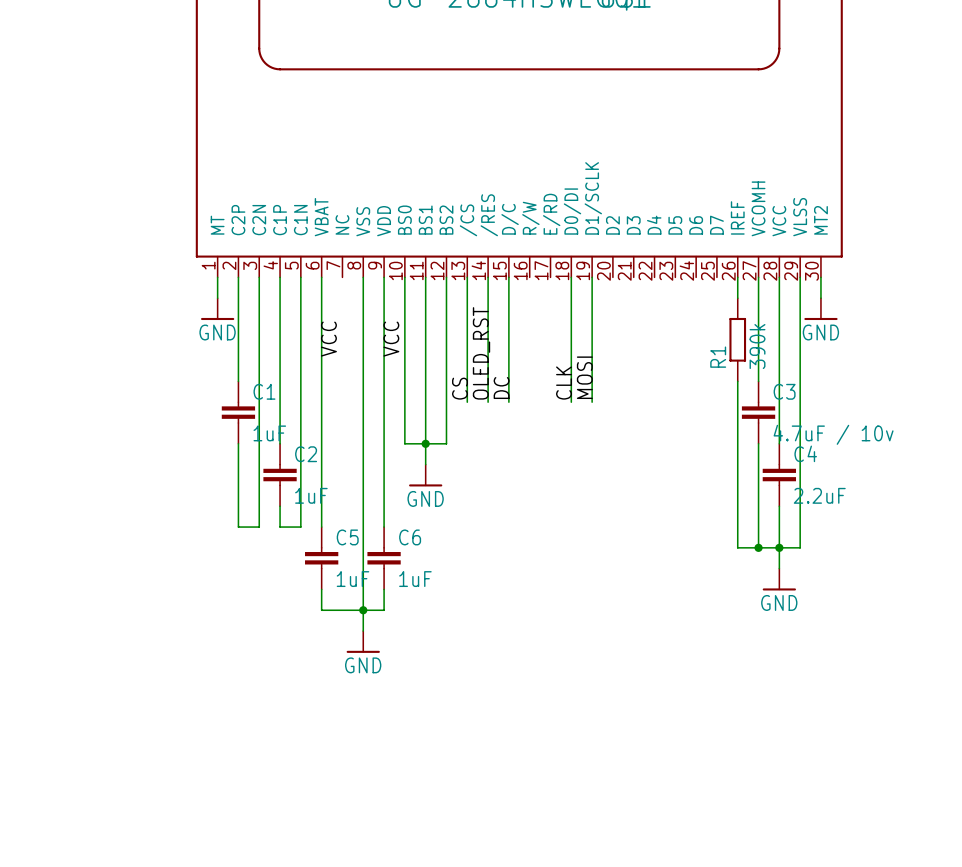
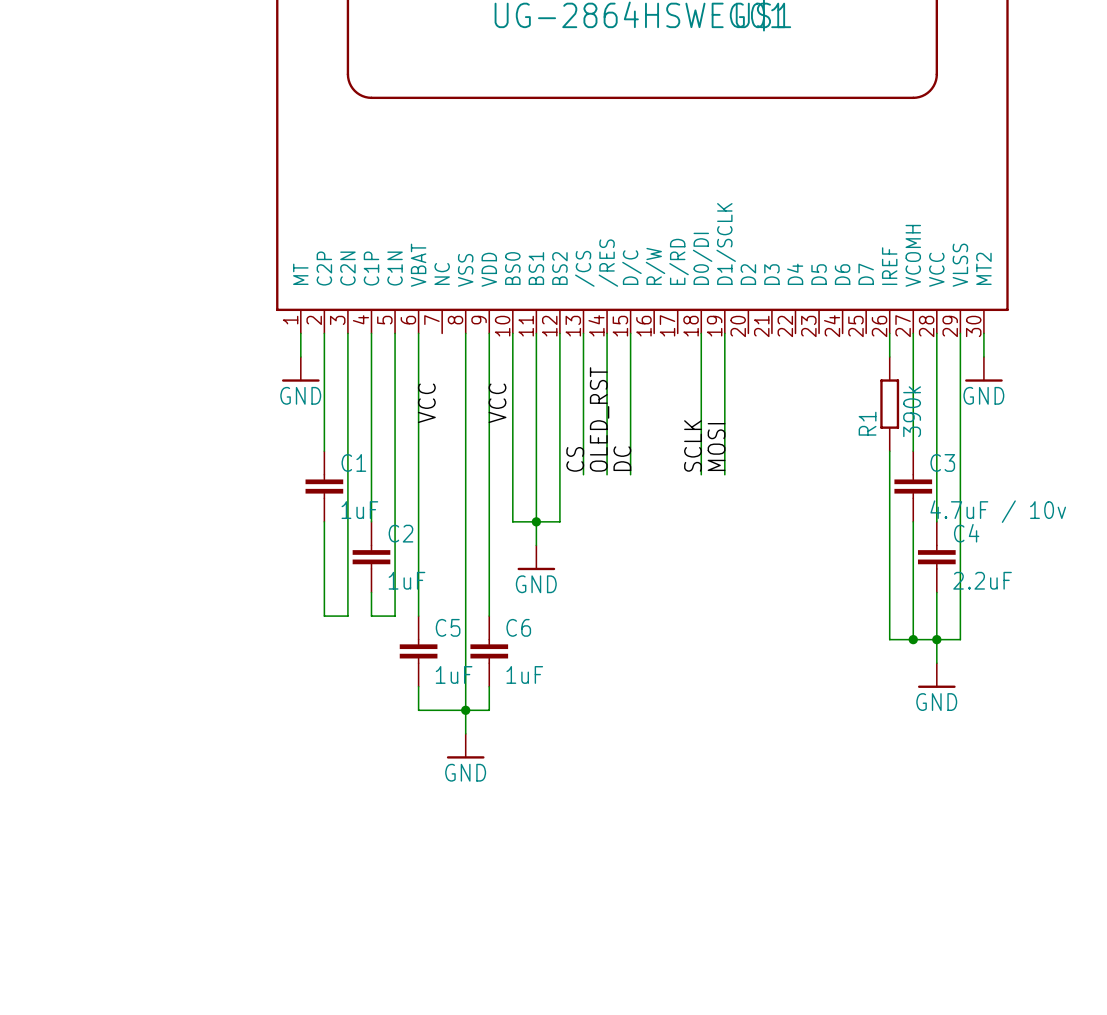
label: CLK (564, 383) -> SCLK (693, 445)

